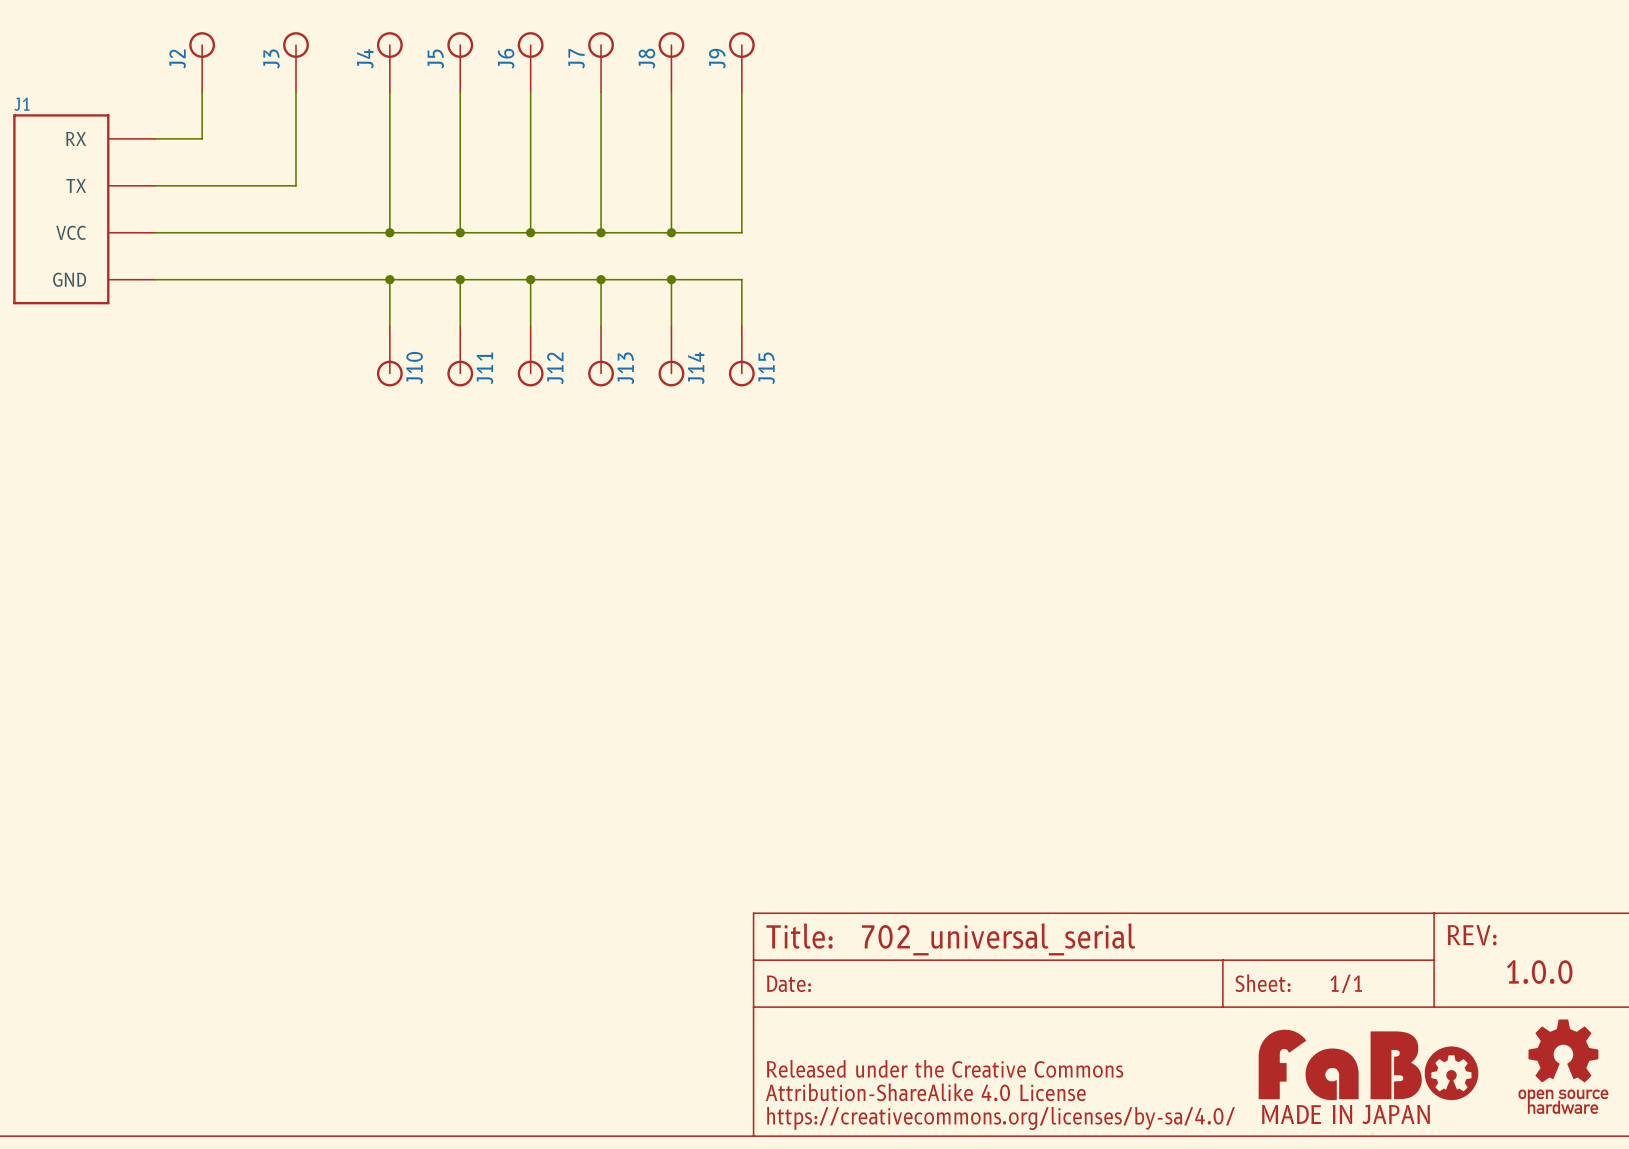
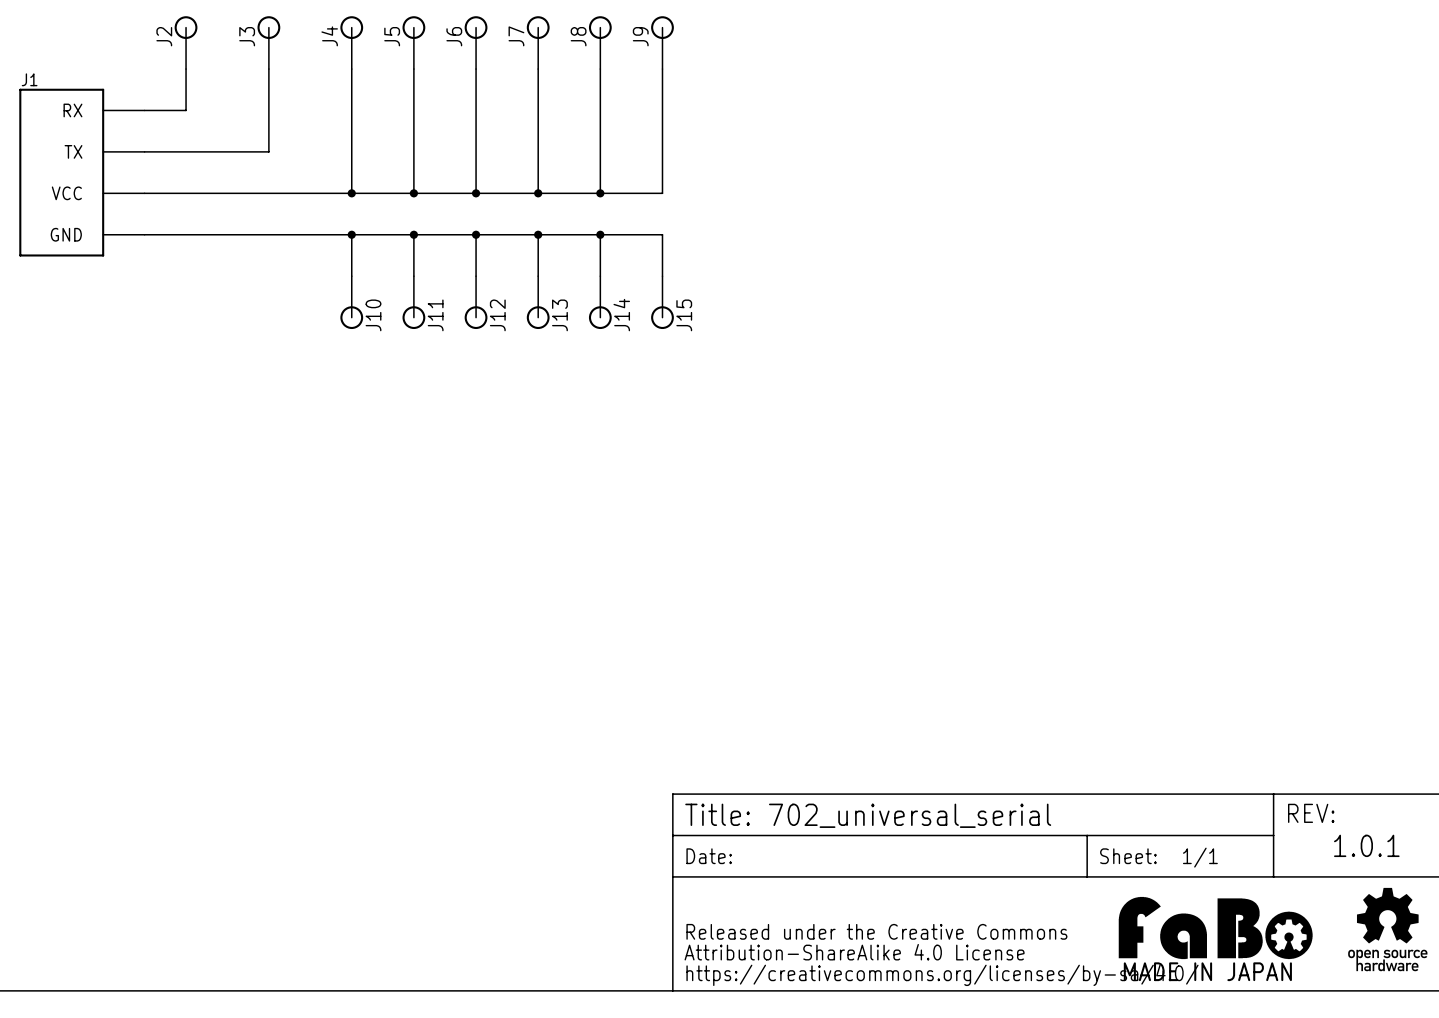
text: 1.0.0 (1539, 972) -> 1.0.1 (1366, 845)

